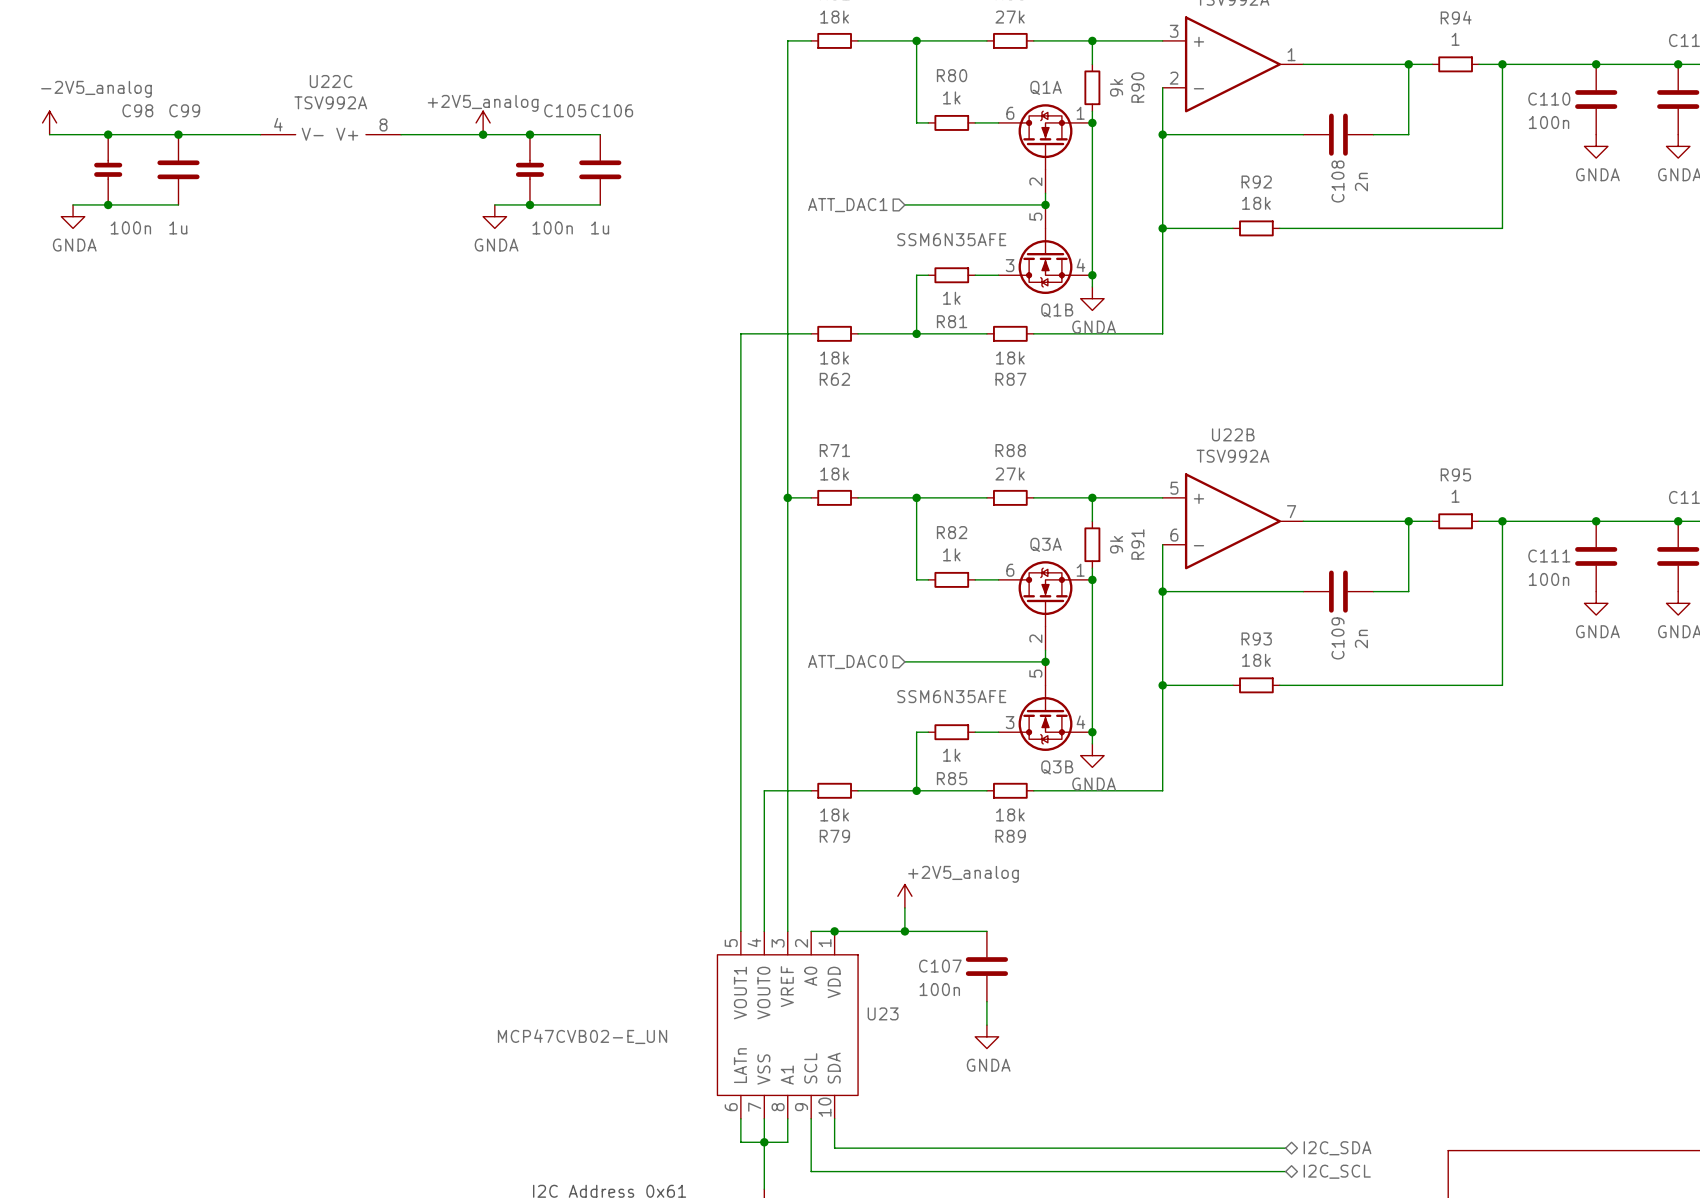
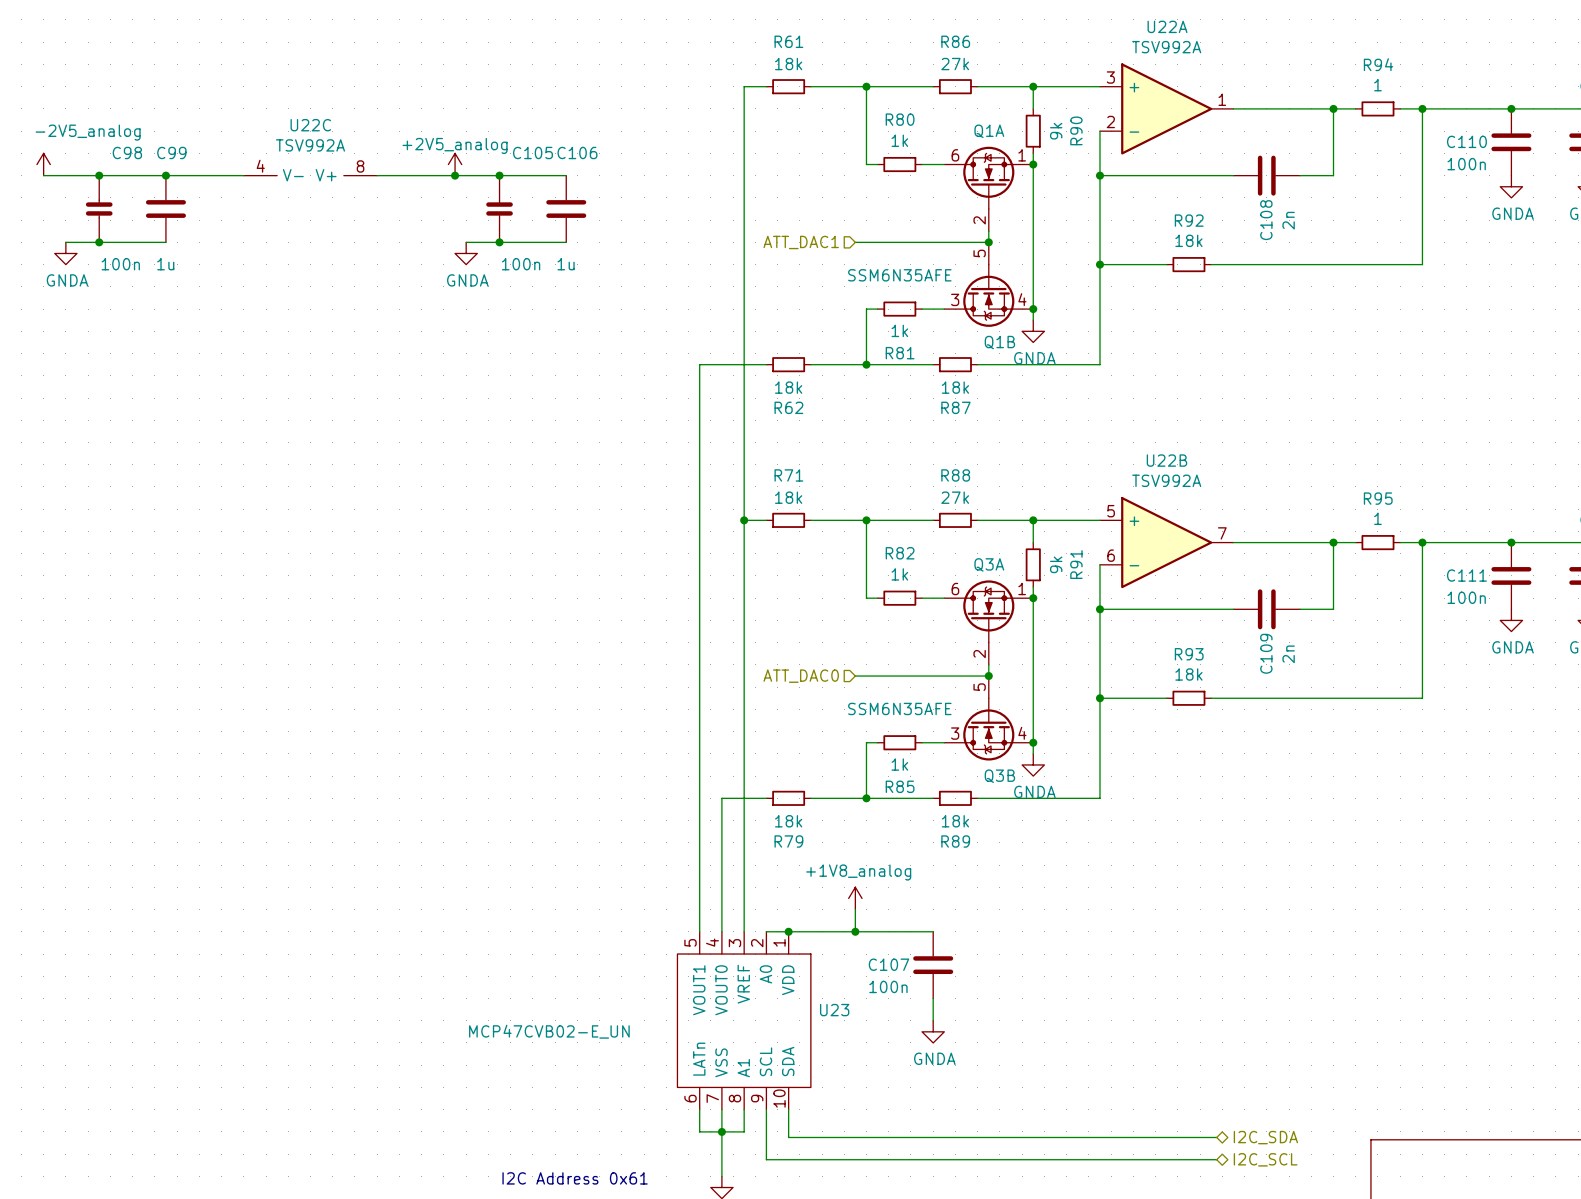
power symbol: +2V5_analog (904, 896) -> +1V8_analog (855, 898)

